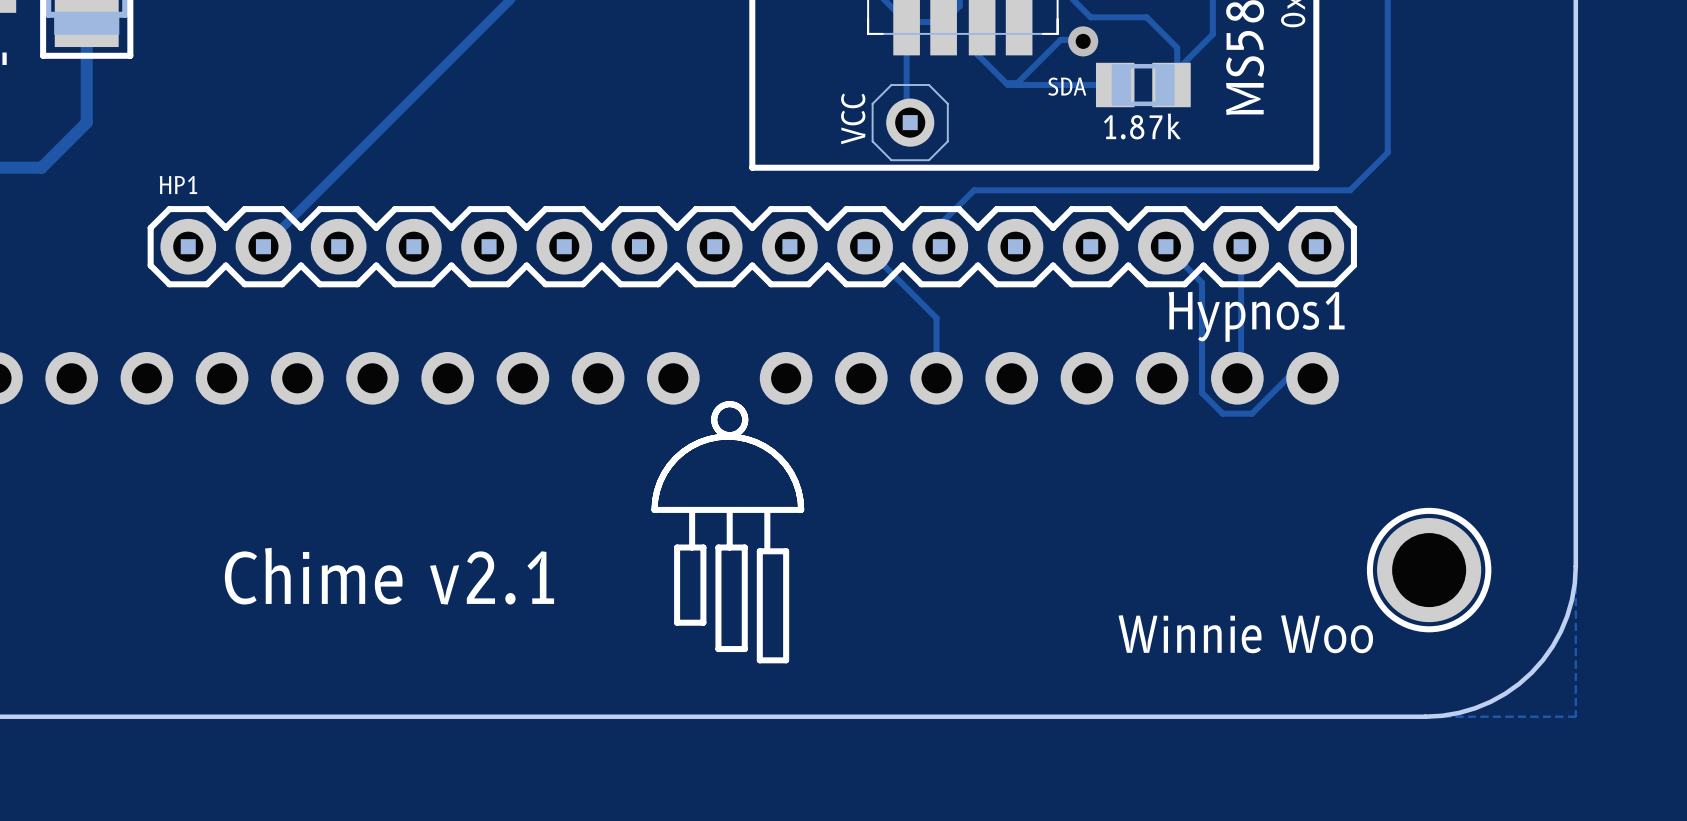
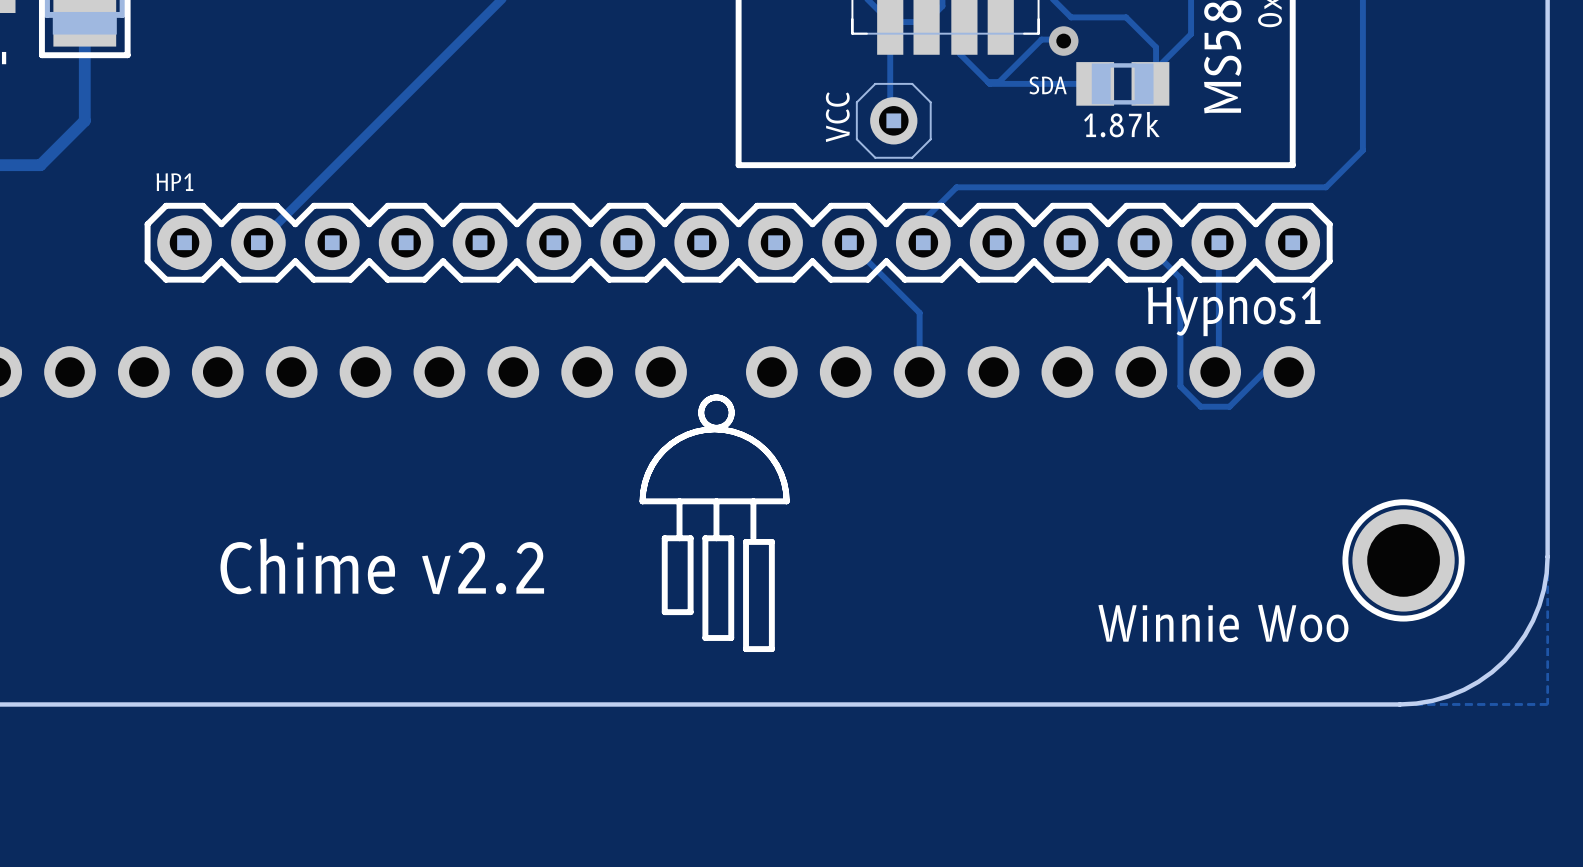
text: Chime v2.1 (389, 576) -> Chime v2.2 (382, 566)

